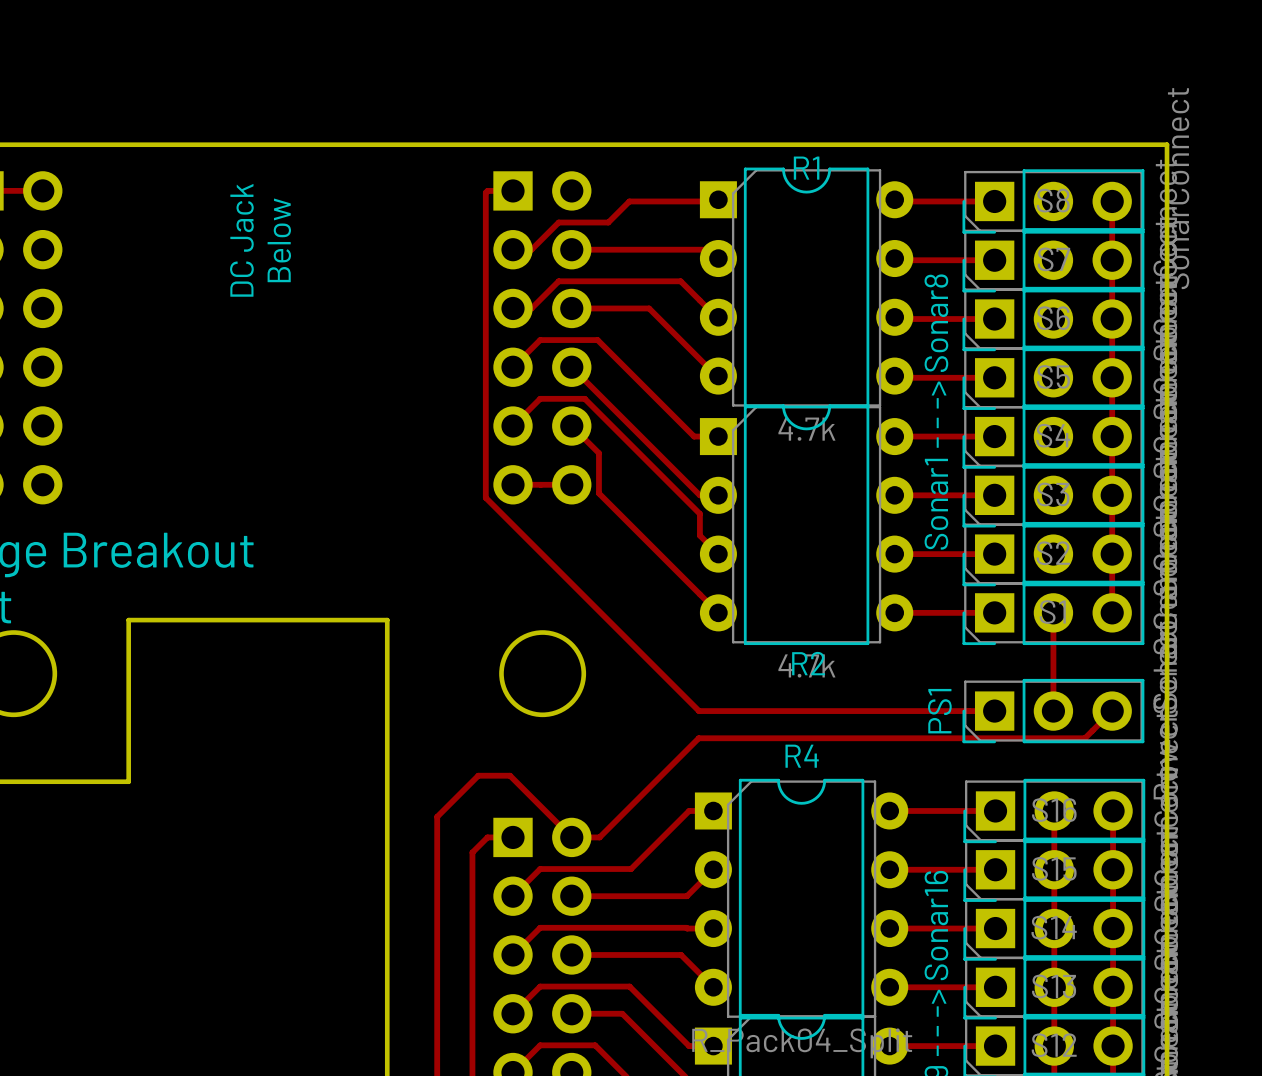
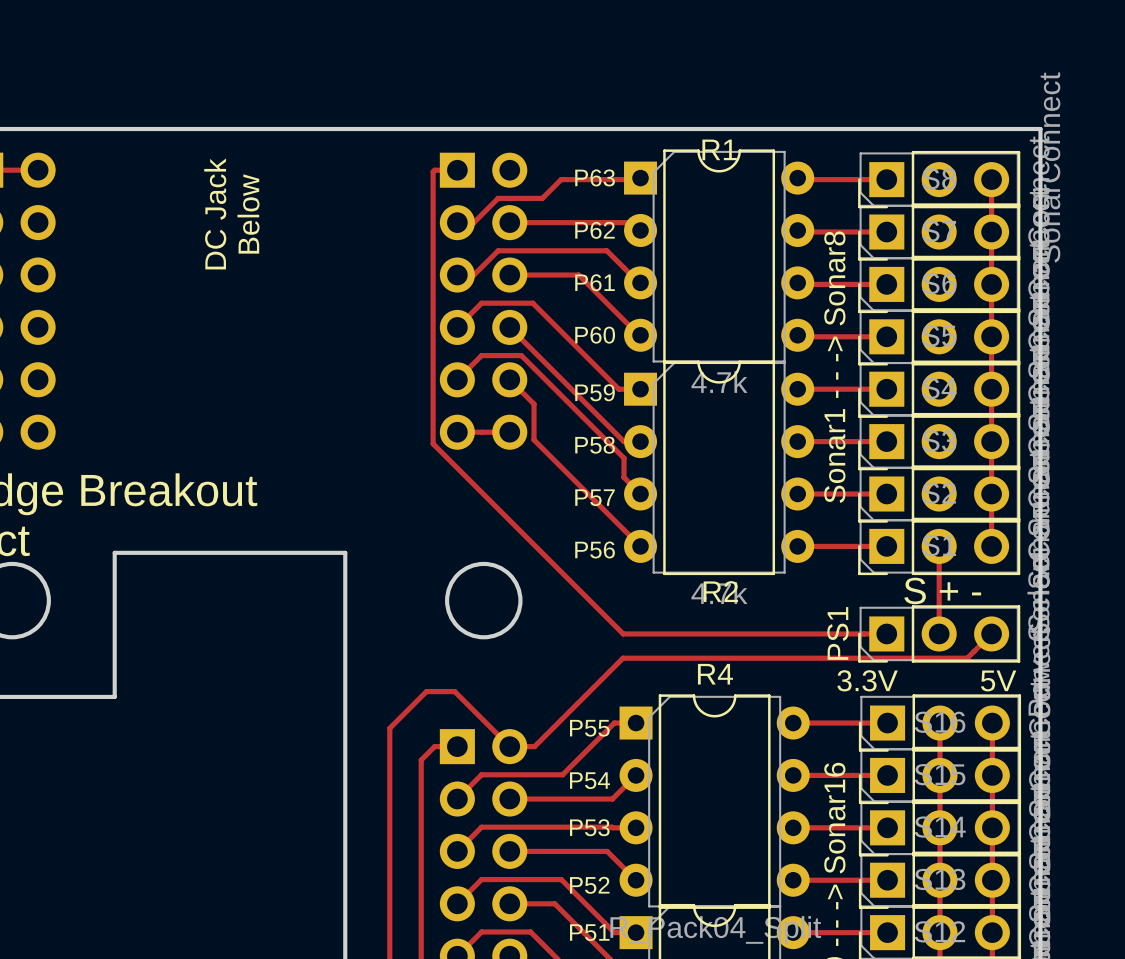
text: none -> P63 (595, 177)
text: none -> P62 (594, 230)
text: none -> P61 (595, 282)
text: none -> P60 (595, 335)
text: none -> P59 (595, 392)
text: none -> P58 (595, 445)
text: none -> P57 (594, 497)
text: none -> P56 (595, 549)
text: none -> S + - (942, 590)
text: none -> 3.3V (867, 680)
text: none -> 5V (998, 680)
text: none -> P55 (589, 728)
text: none -> P54 (590, 780)
text: none -> P53 (589, 827)
text: none -> P52 (589, 885)
text: none -> P51 (589, 932)

